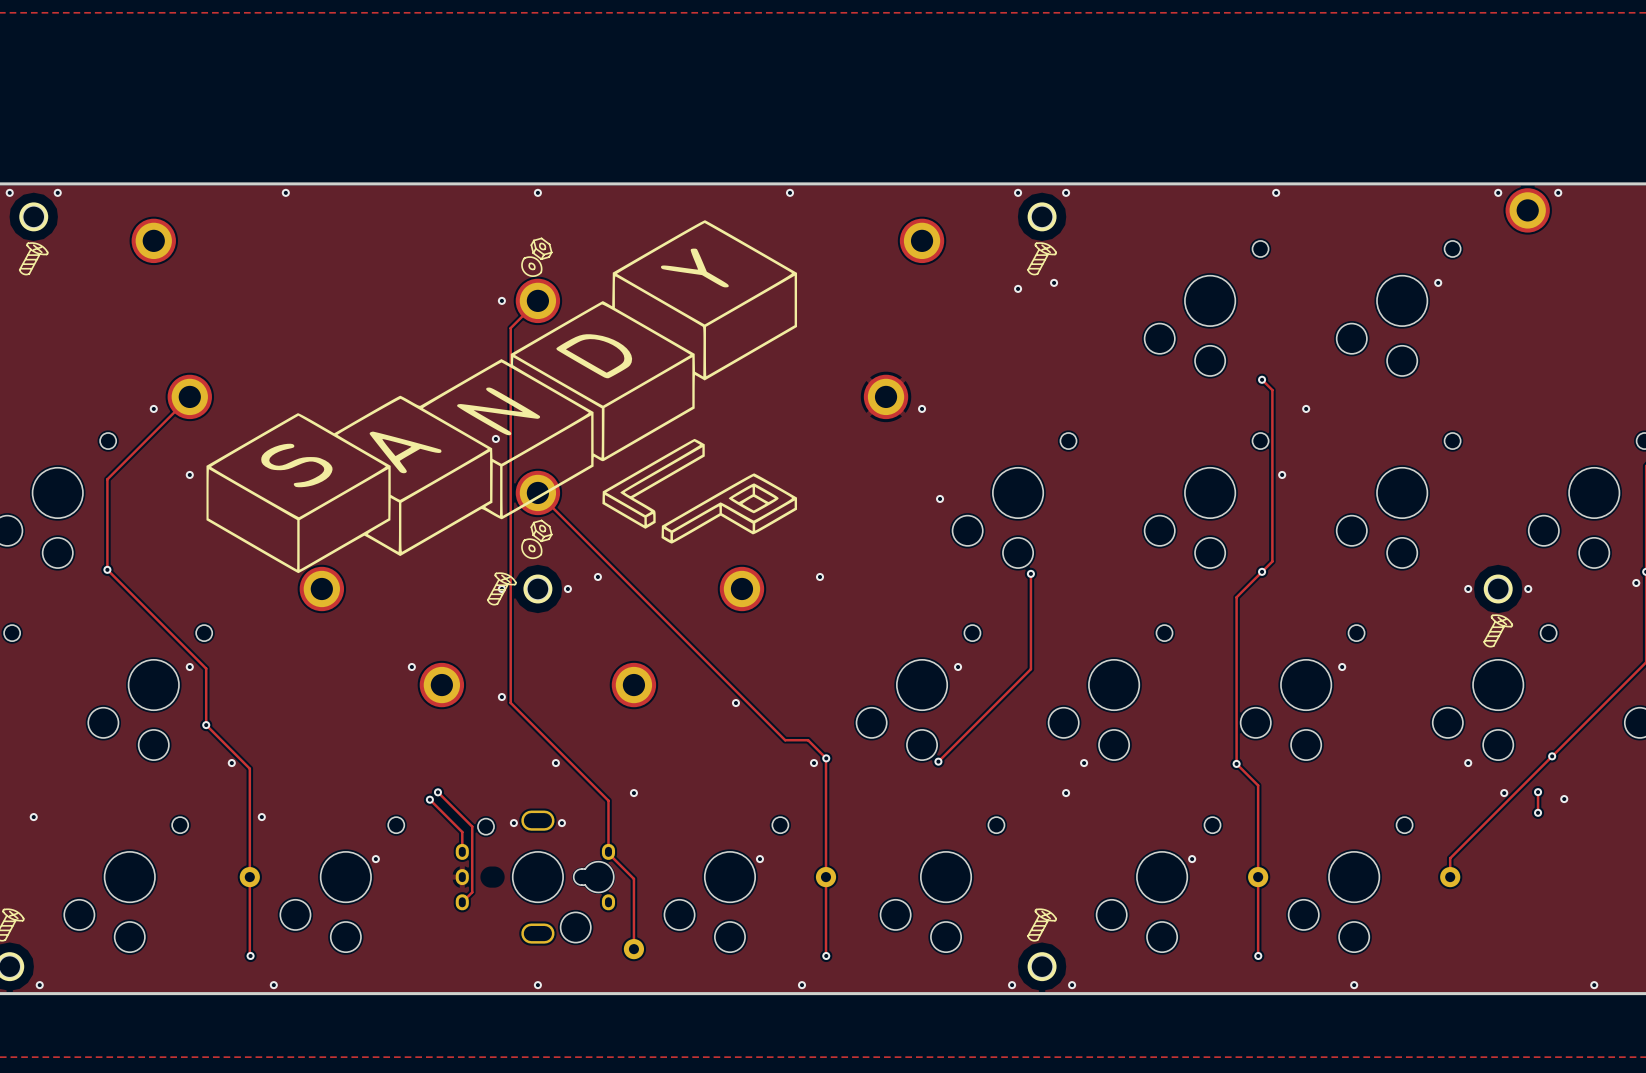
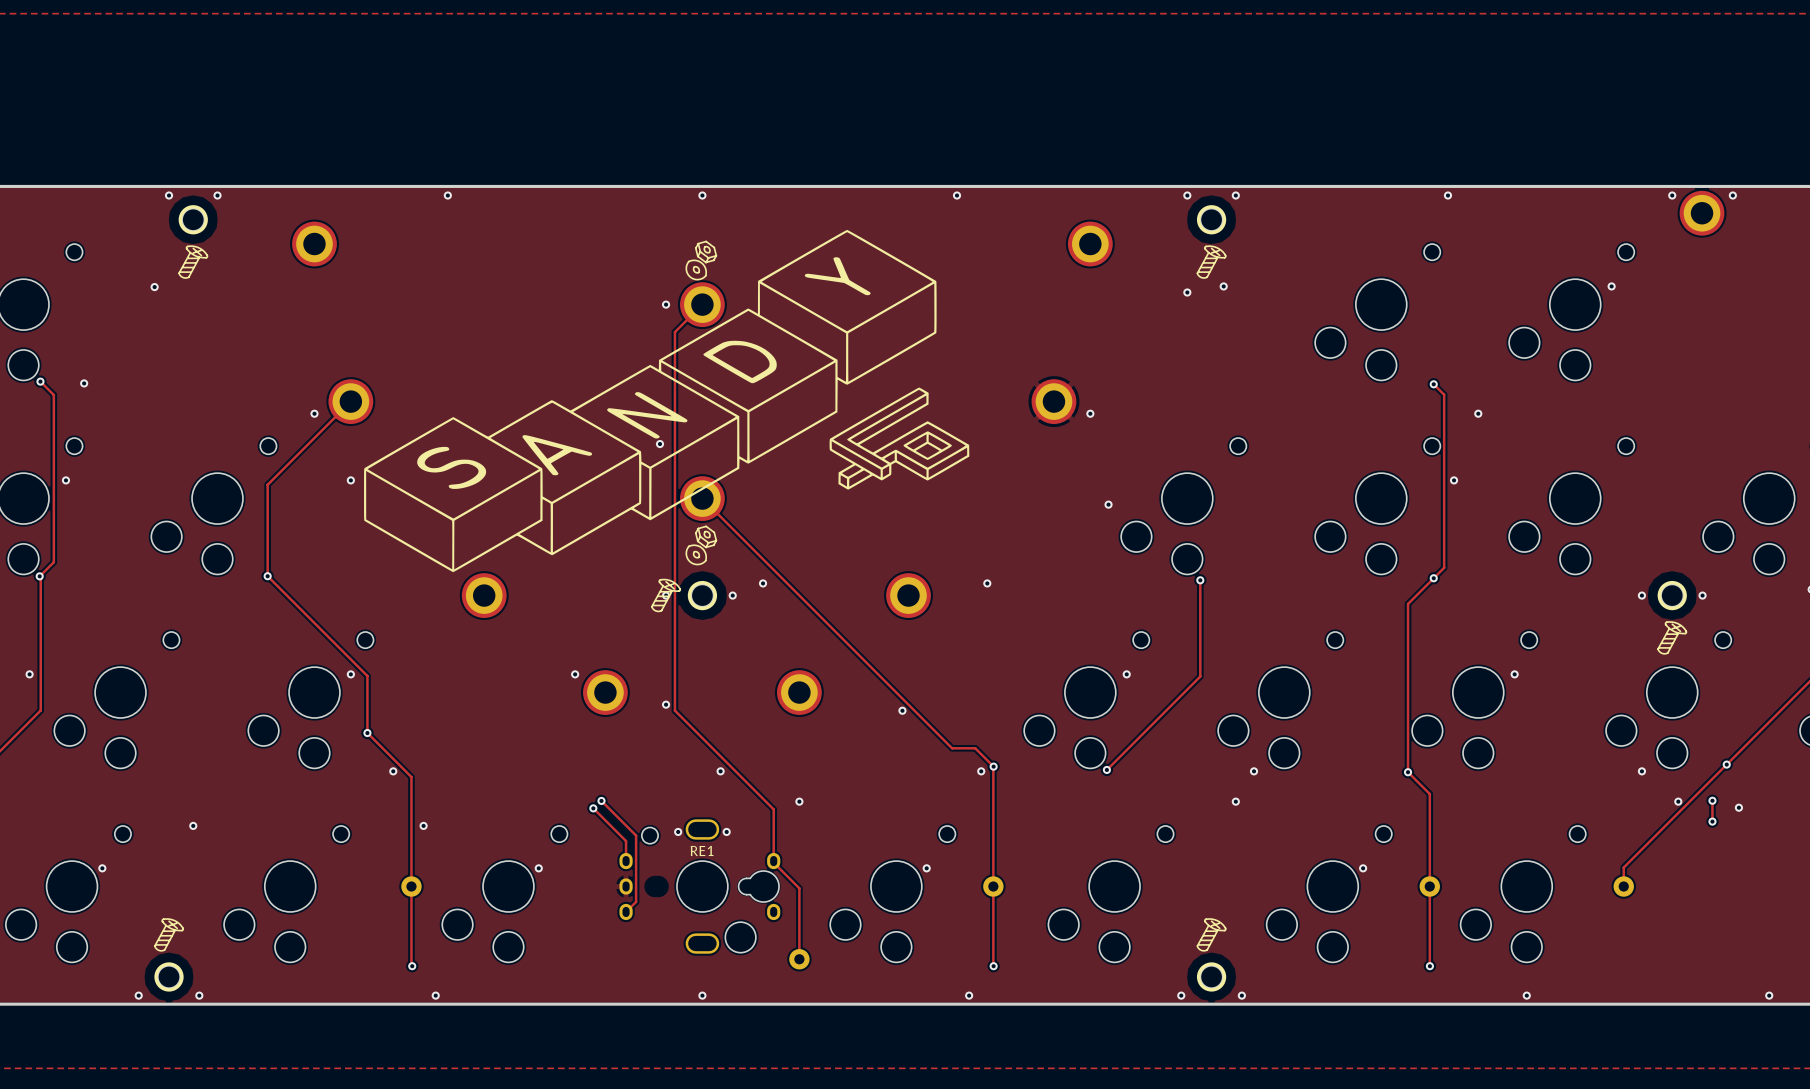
drawing shape: [206, 220, 798, 574] -> [364, 229, 970, 573]
part text: none -> RE1 (702, 850)

